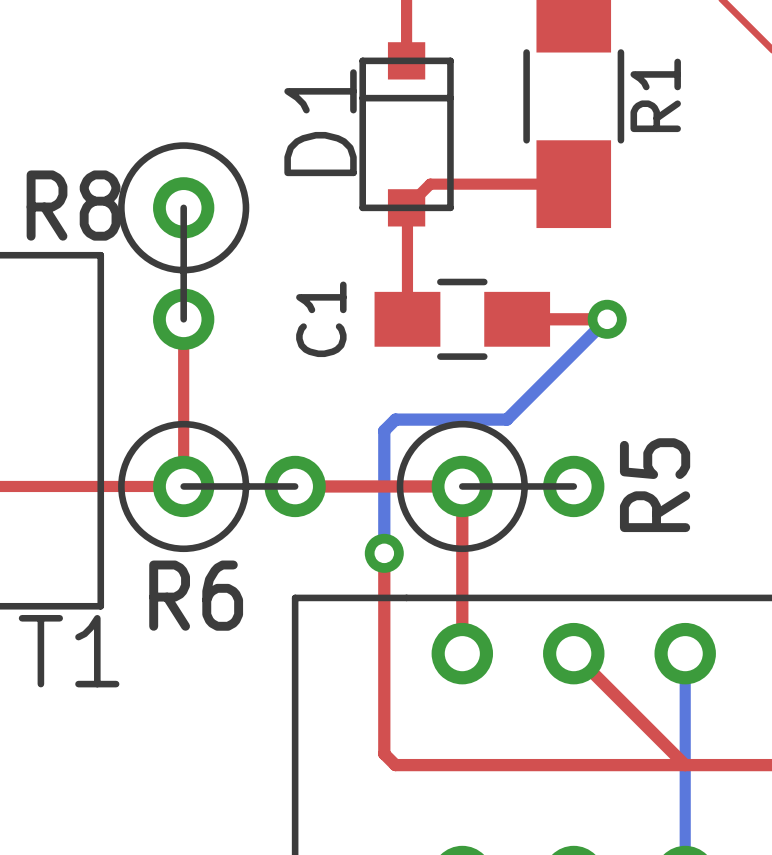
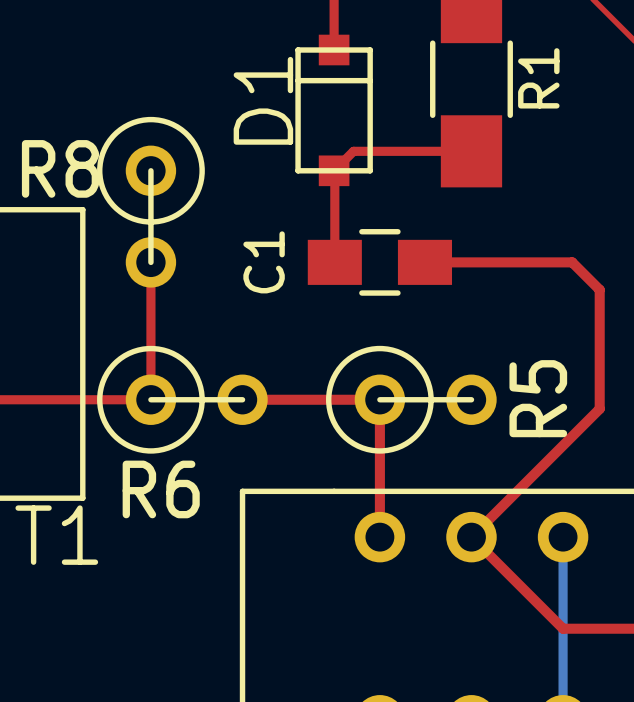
top track: none -> (498, 262) (572, 262) (599, 289) (599, 408) (471, 537)
bottom track: (607, 319) (506, 419) (395, 419) (384, 430) (384, 553) -> none
via: (607, 319) -> none
top track: (384, 553) (384, 753) (395, 765) (685, 765) -> none
via: (384, 553) -> none

